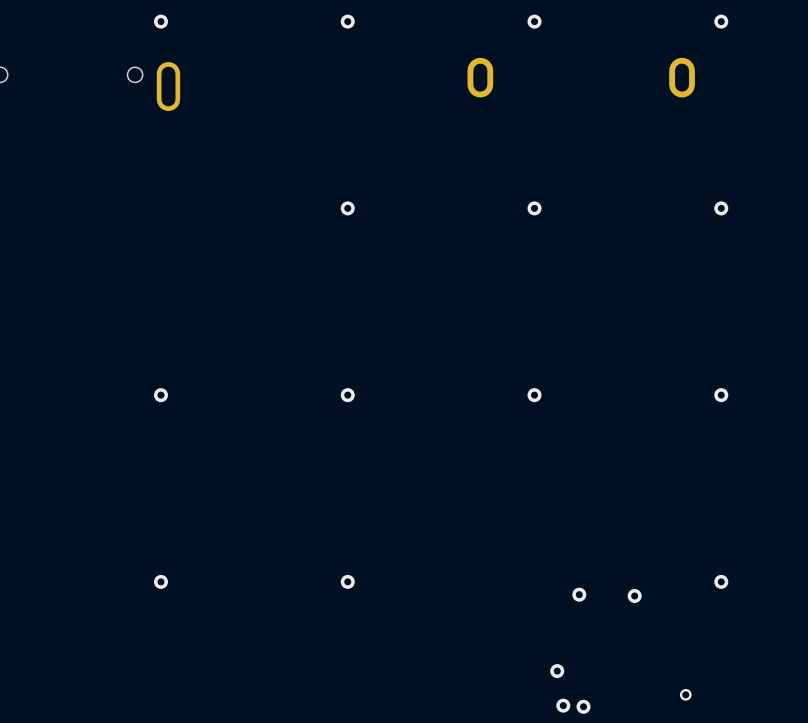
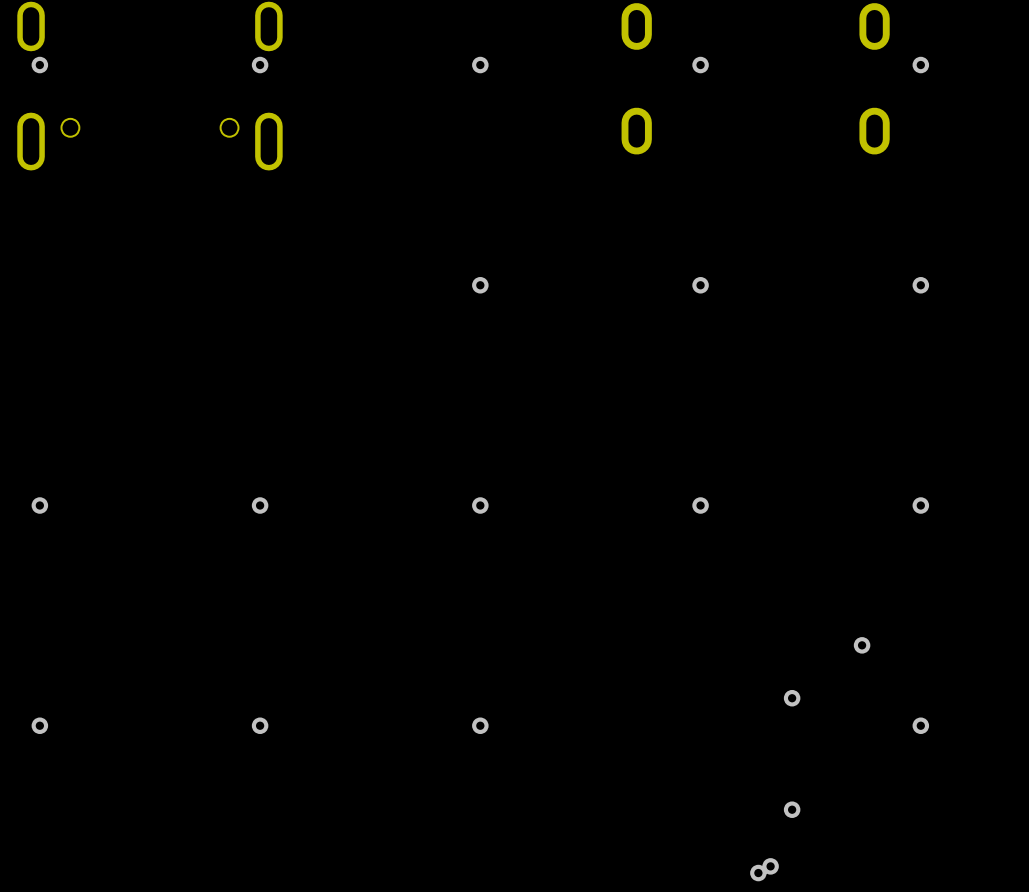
via: none -> (862, 645)
via: none -> (792, 698)
via: (579, 594) -> none
via: (634, 595) -> none
via: none -> (792, 809)
via: (557, 671) -> none
via: (685, 694) -> none
via: none -> (770, 866)
via: (563, 705) -> none

